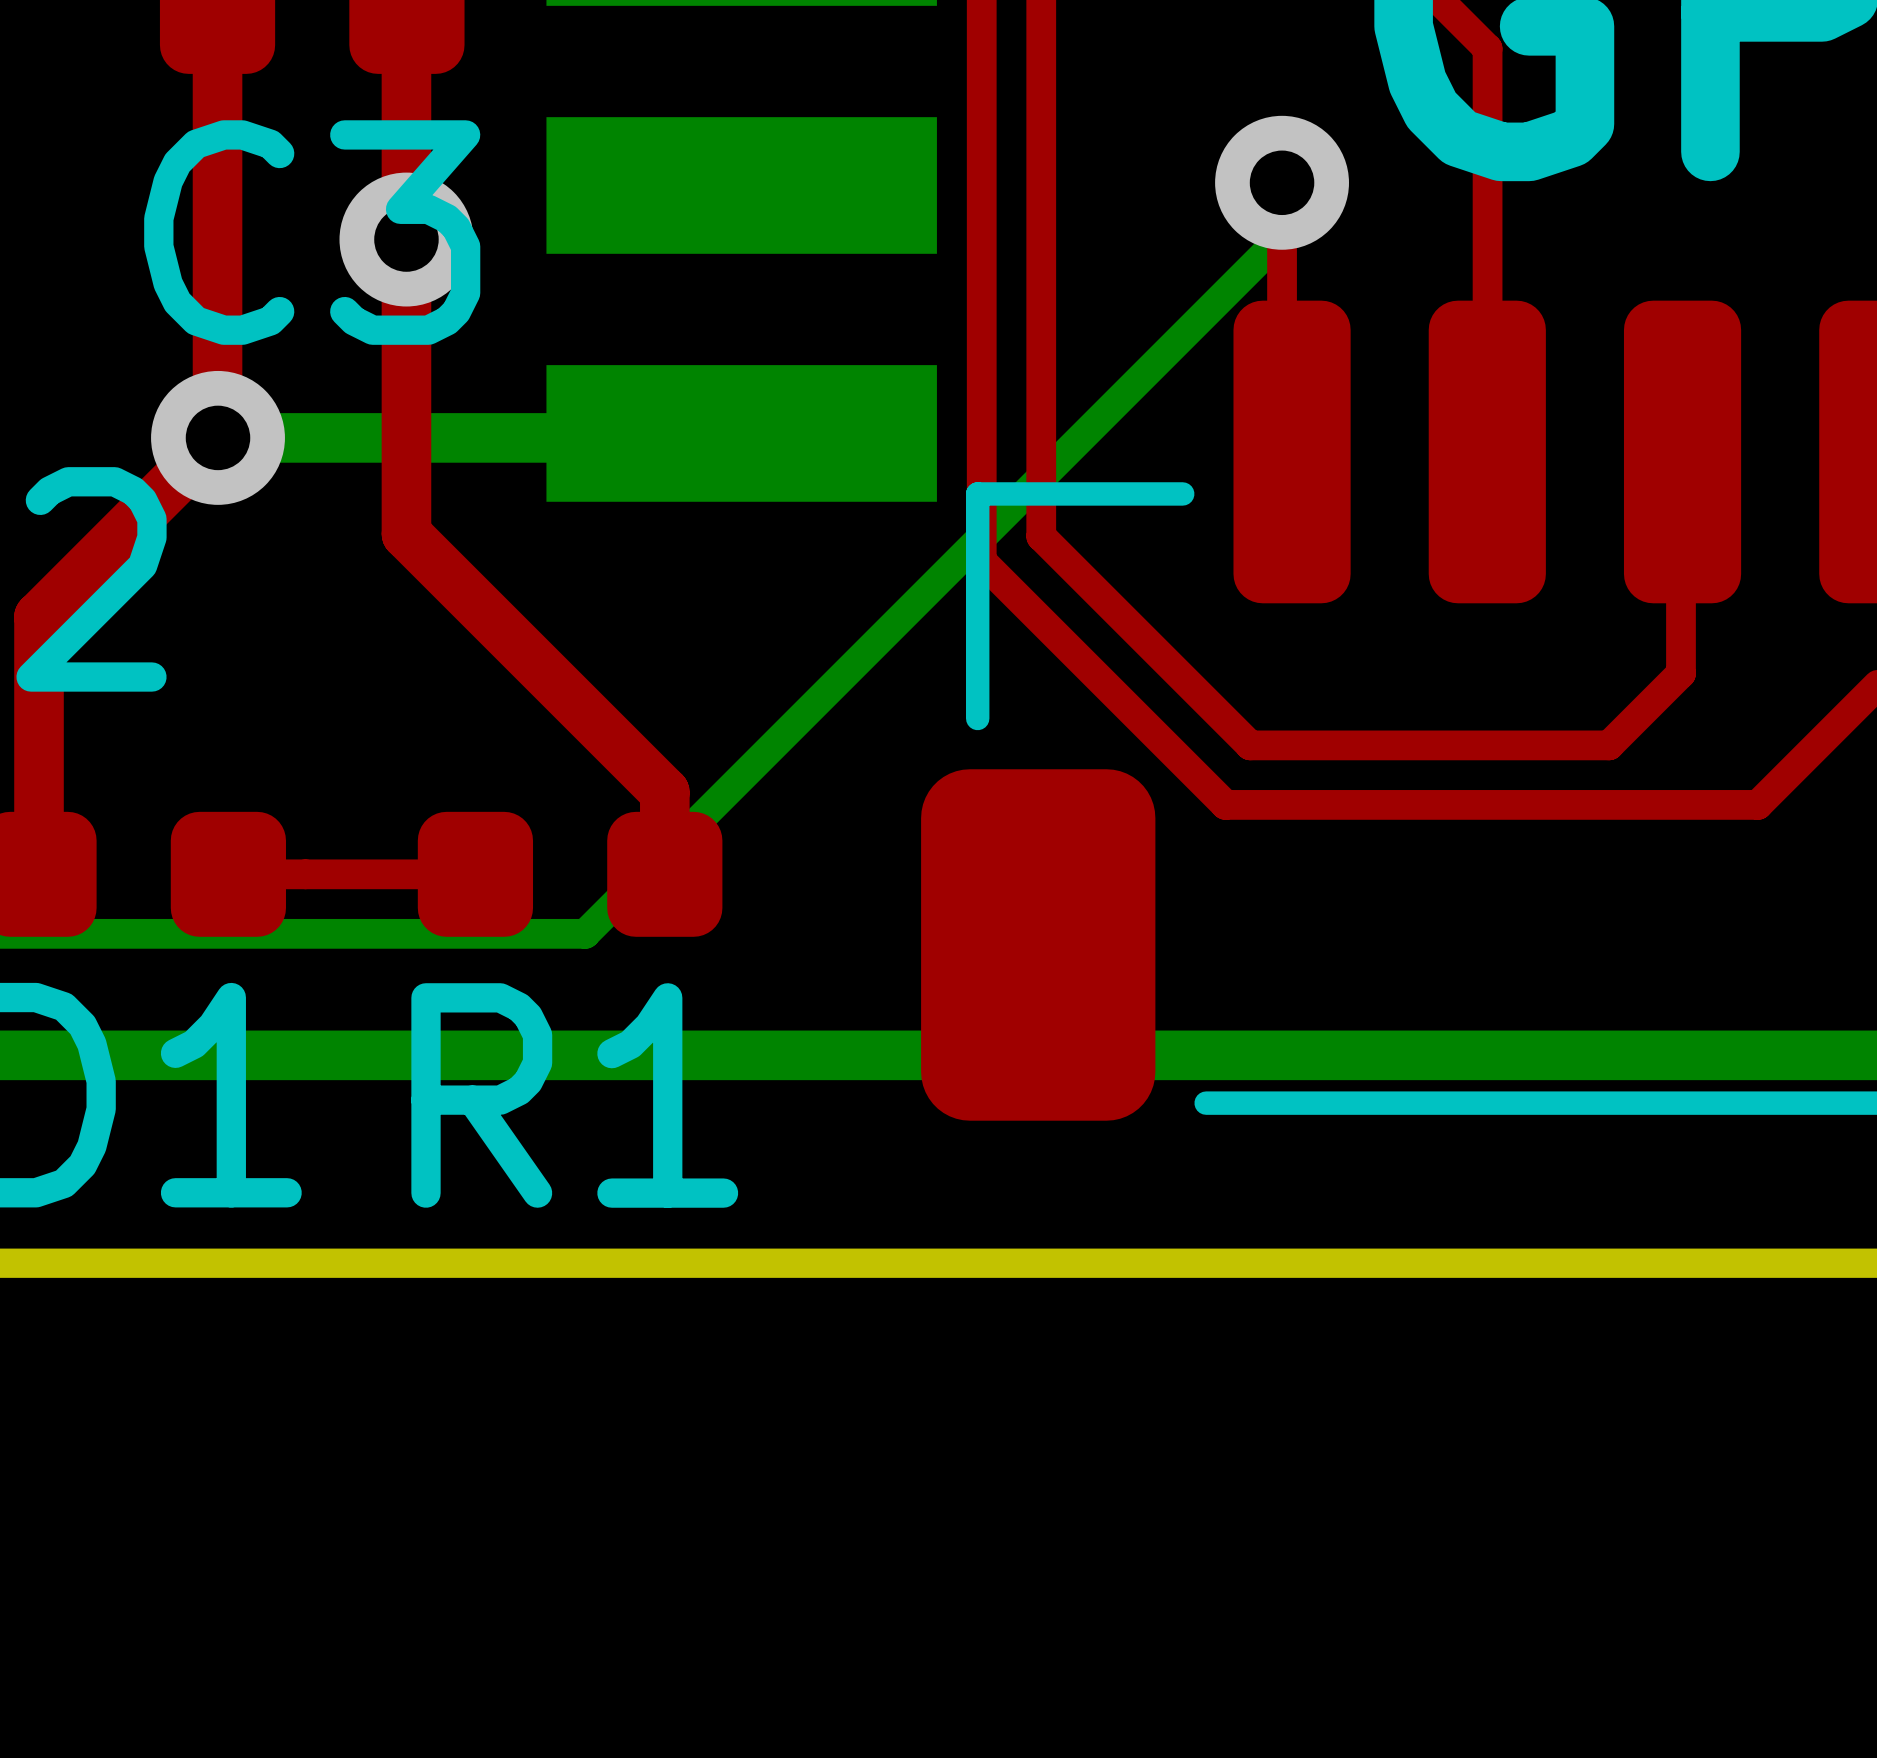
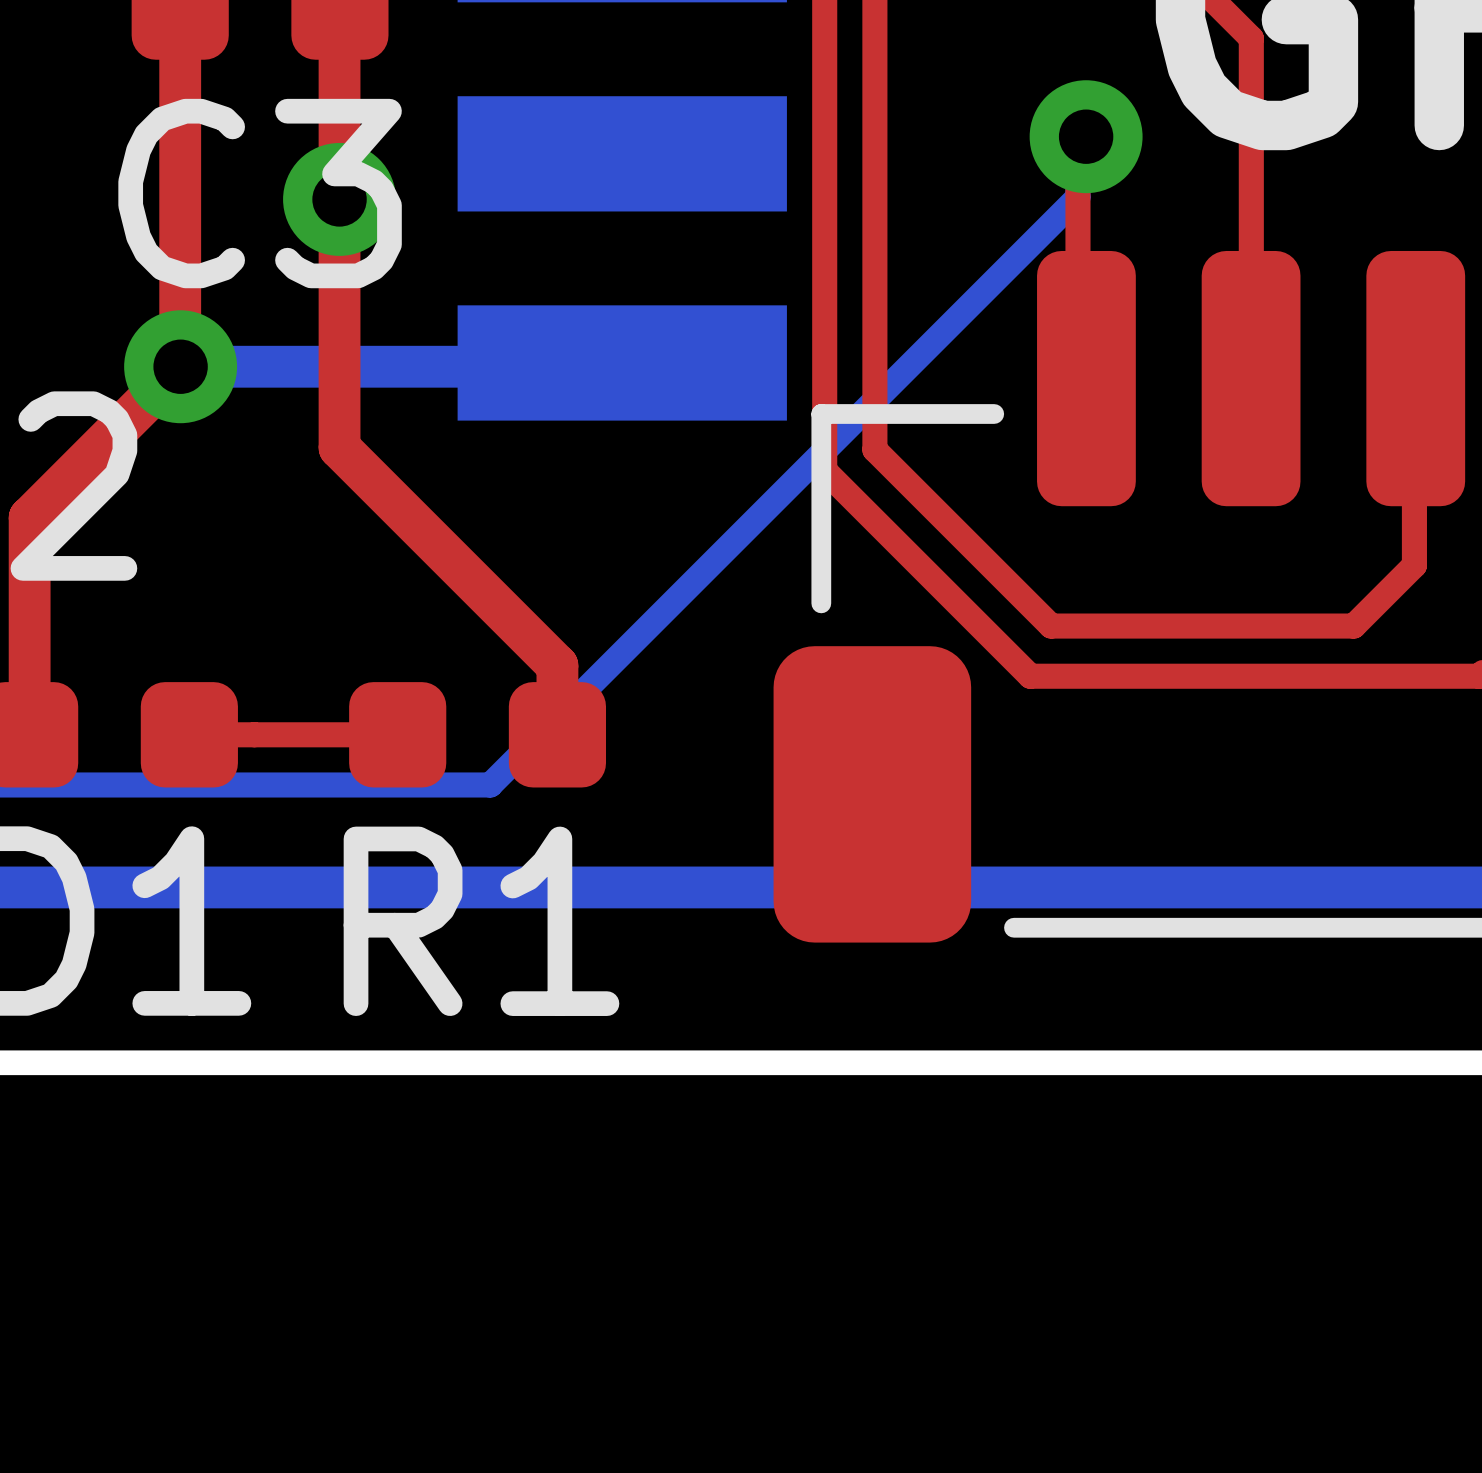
via position: (1282, 182) -> (1086, 136)

